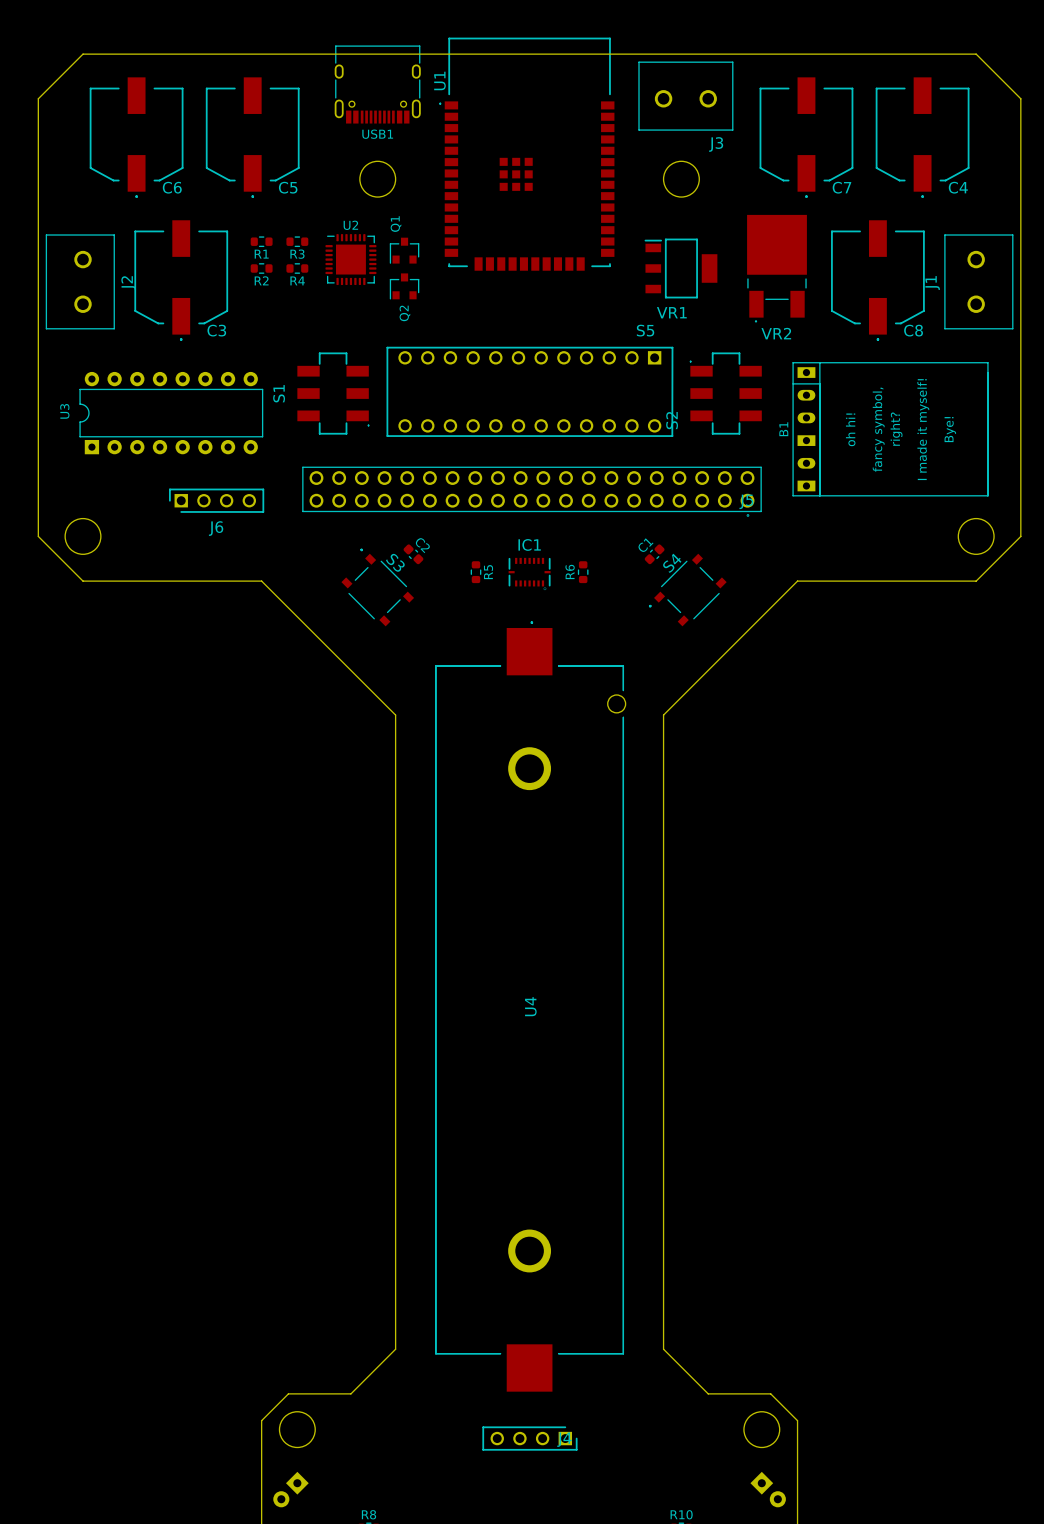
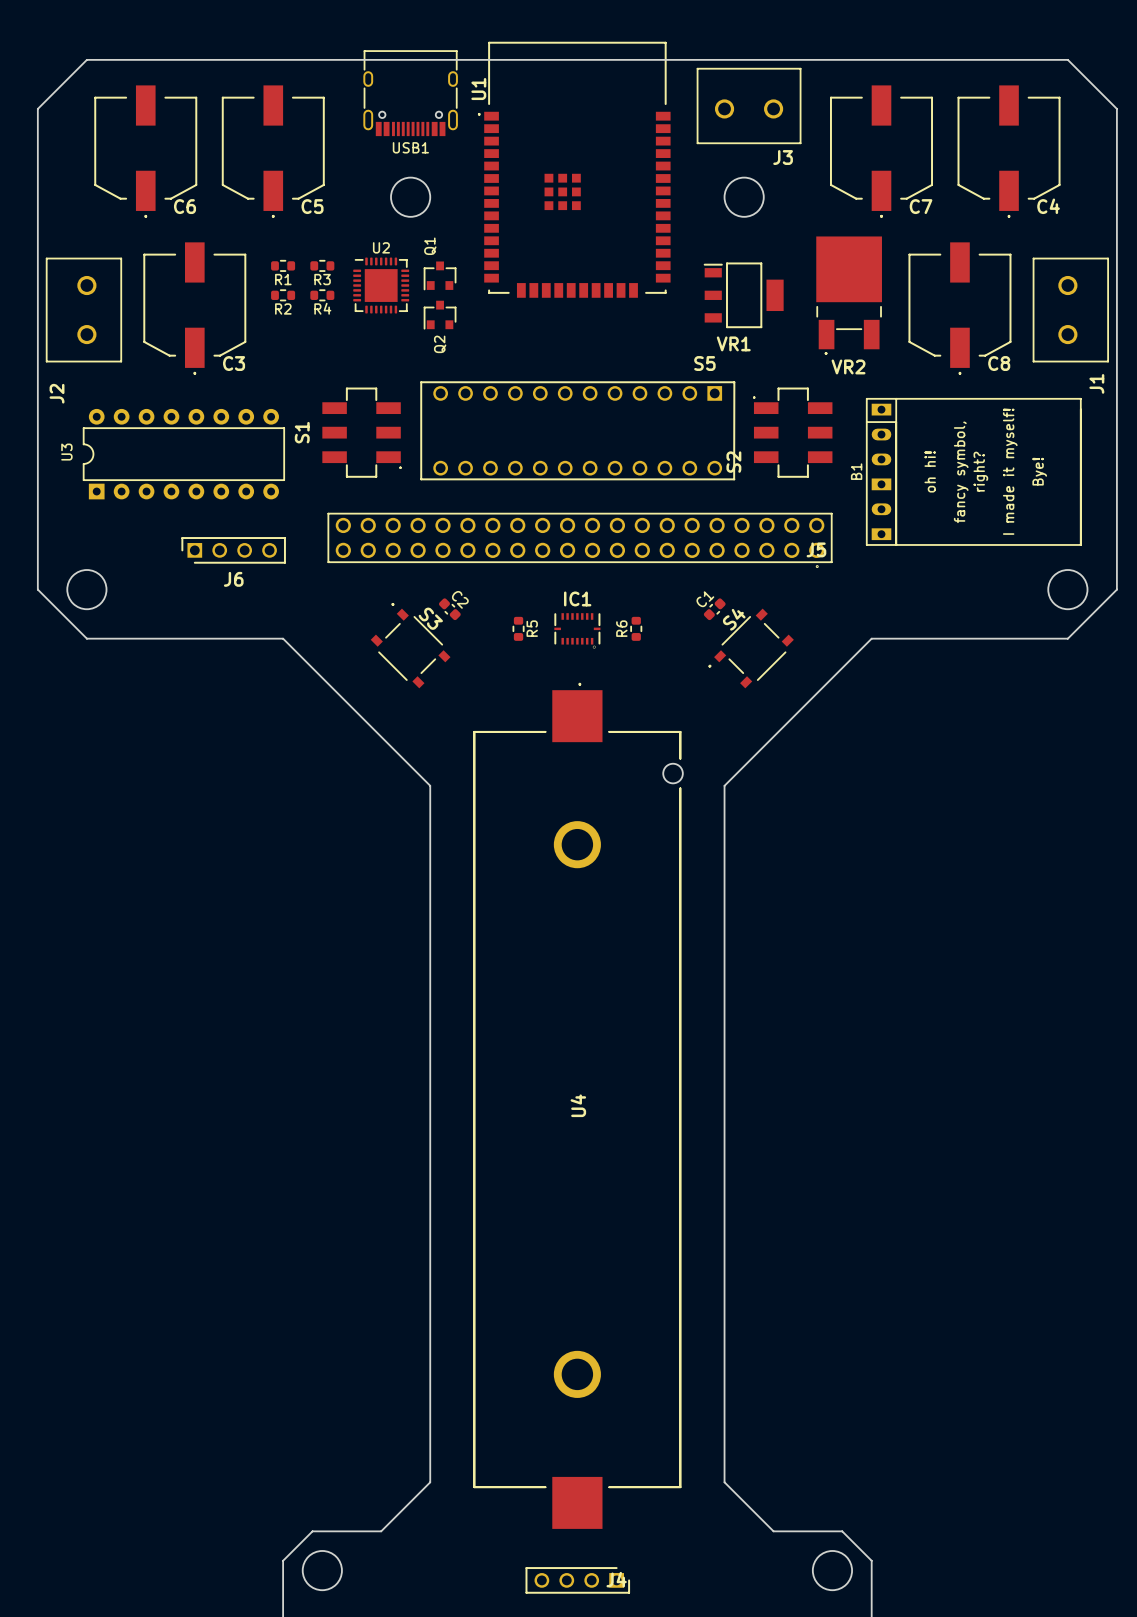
J2 name position: J2 (128, 283) -> J2 (57, 393)
J1 name position: J1 (932, 283) -> J1 (1096, 383)

